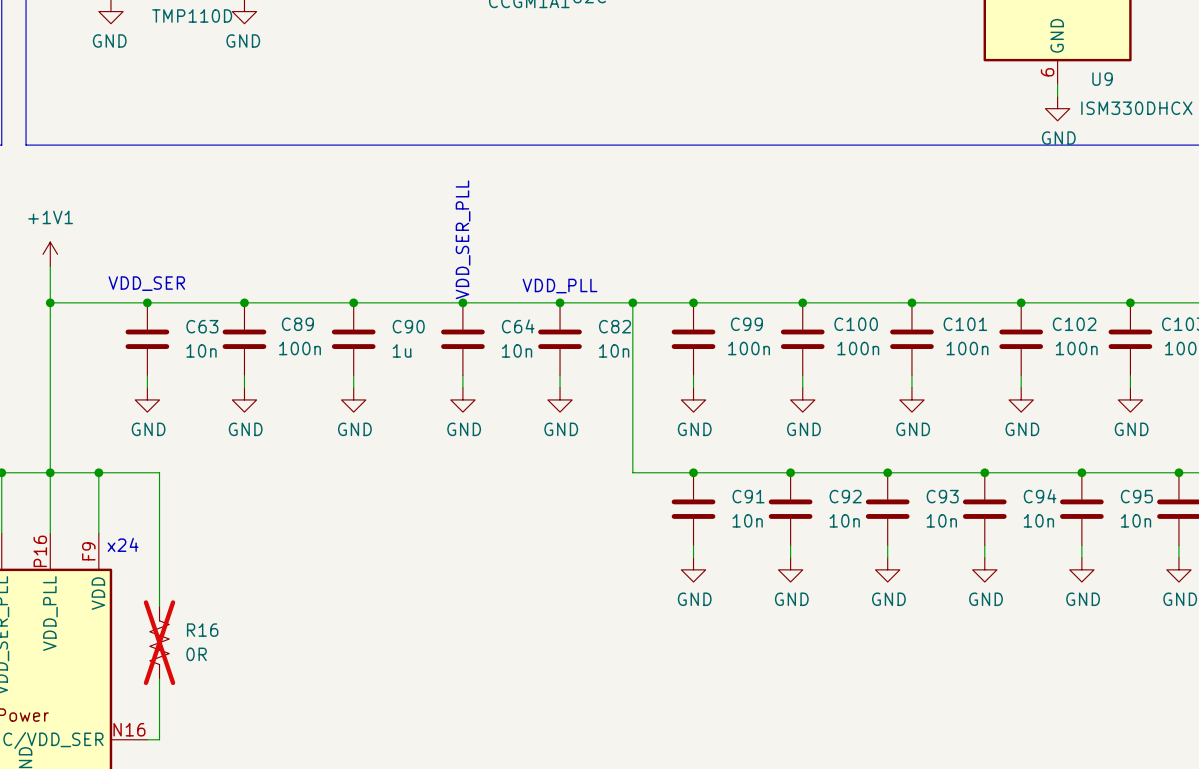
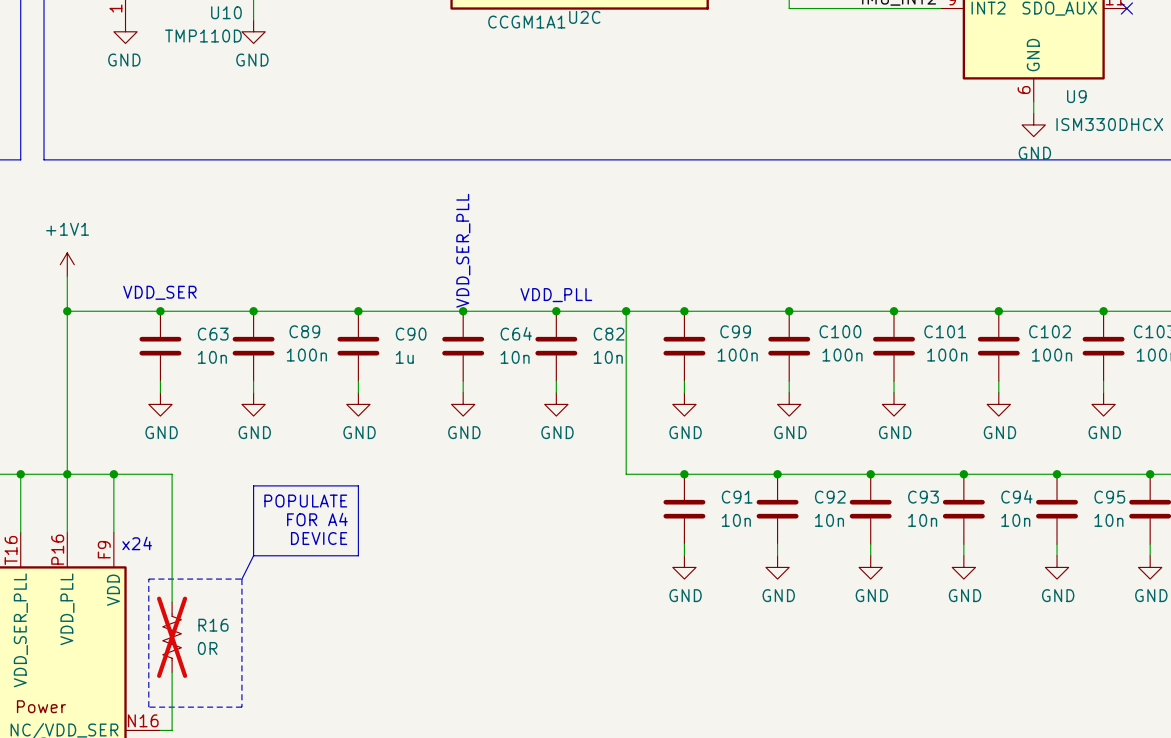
text: none -> POPULATE (305, 501)
text: none -> FOR A4 (317, 519)
text: none -> DEVICE (319, 538)
line: none -> (253, 555) (358, 555) (358, 485) (253, 485) (253, 555)
line: none -> (253, 555) (241, 579)
line: none -> (241, 579) (148, 579) (148, 707) (241, 707) (241, 579)

